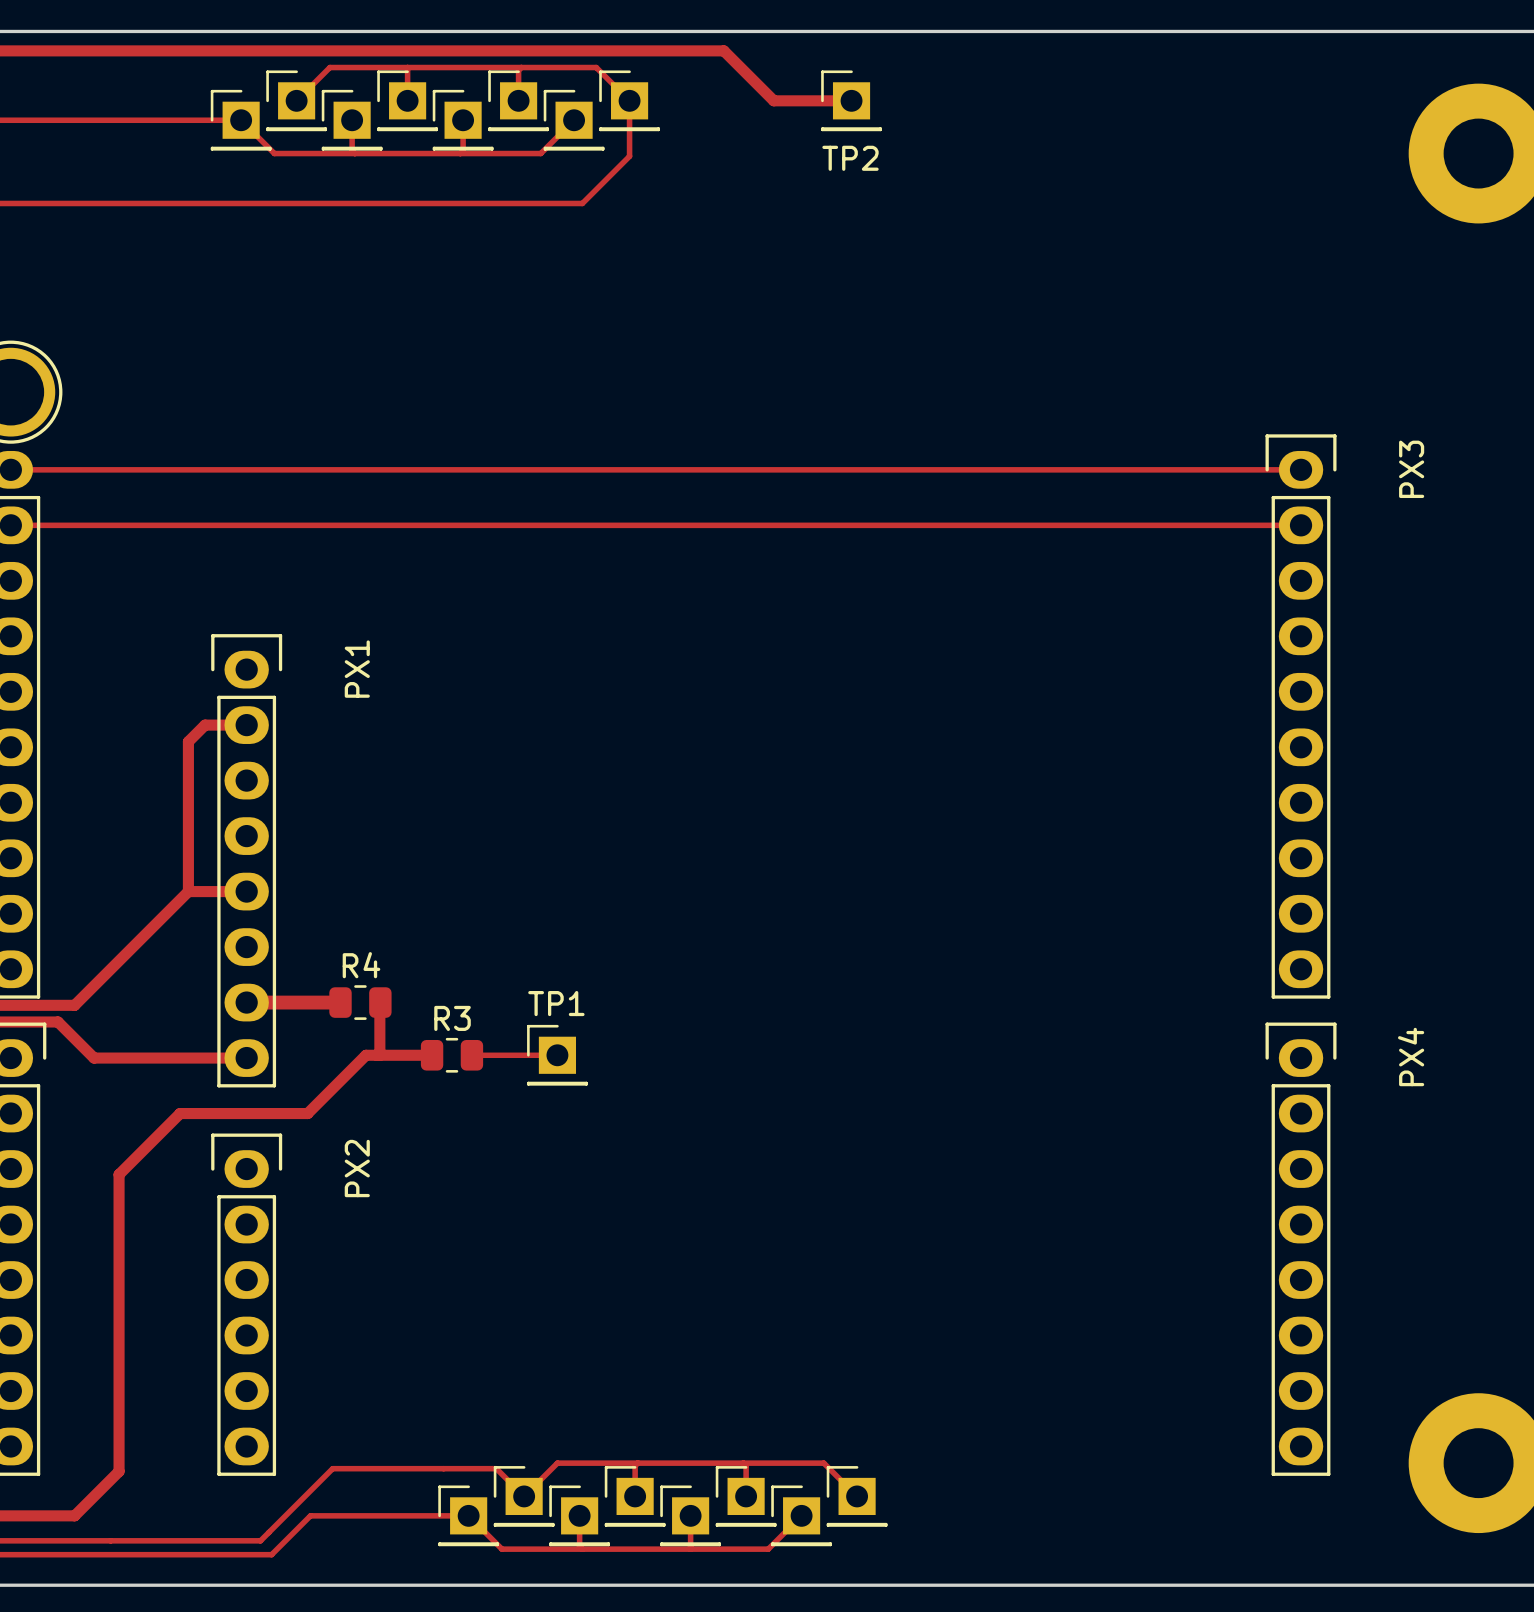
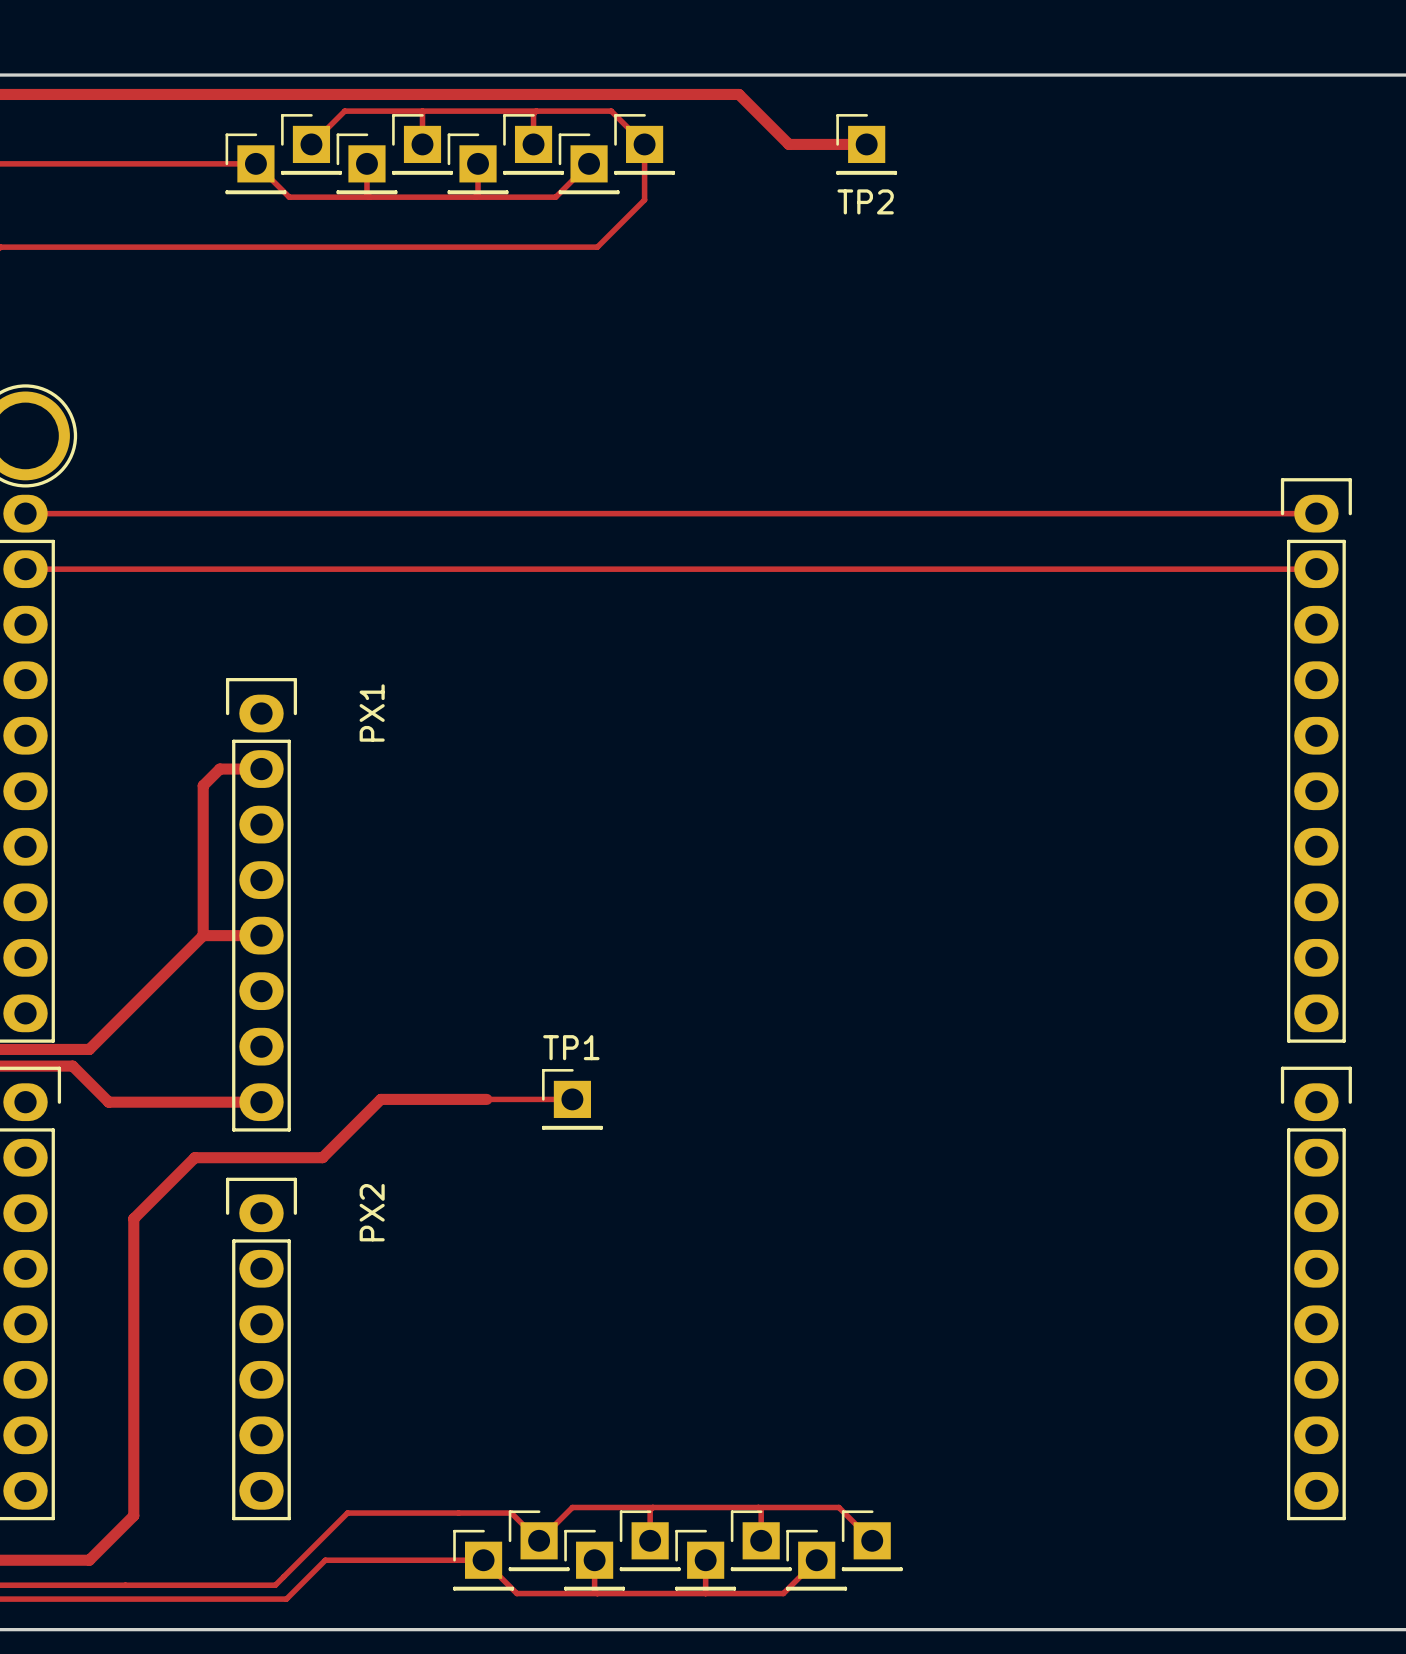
track: (246, 1002) (340, 1002) -> none
R4: (360, 1002) -> none
track: (380, 1002) (379, 1055) -> none
track: none -> (446, 1099) (486, 1099)
R3: (452, 1055) -> none

